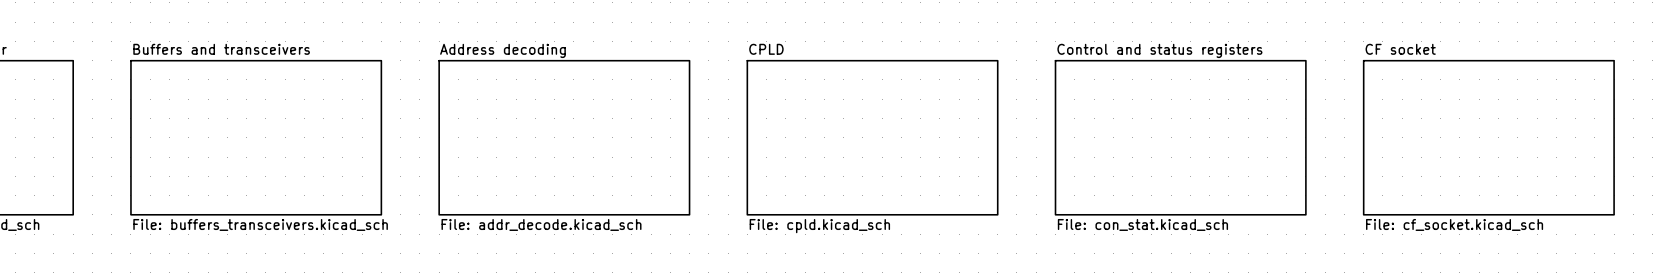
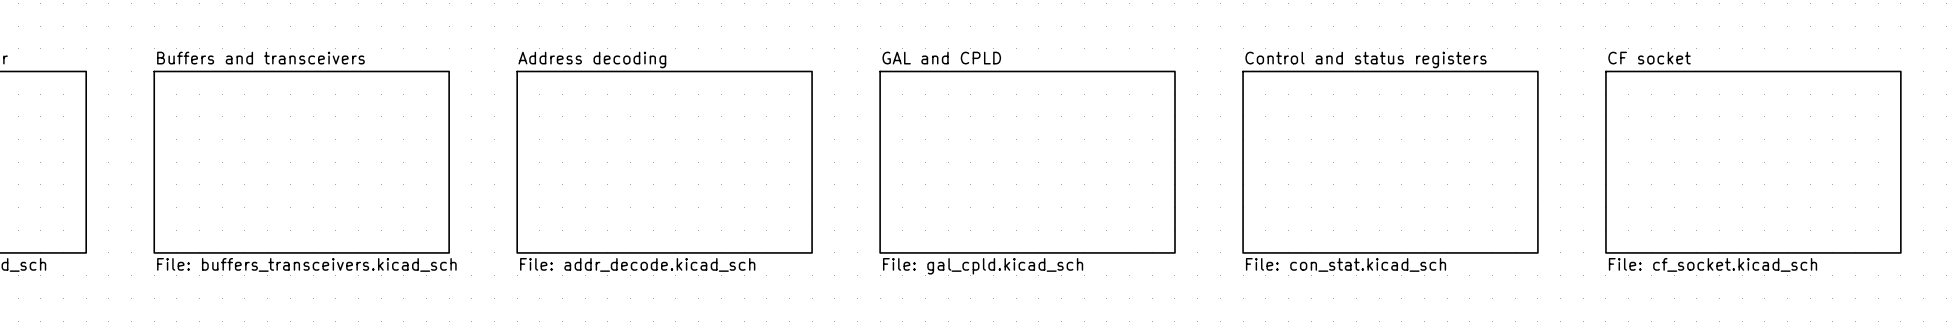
sheet CPLD name: CPLD (766, 49) -> GAL and CPLD (941, 58)
sheet CPLD value: File: cpld.kicad_sch (819, 226) -> File: gal_cpld.kicad_sch (983, 266)

